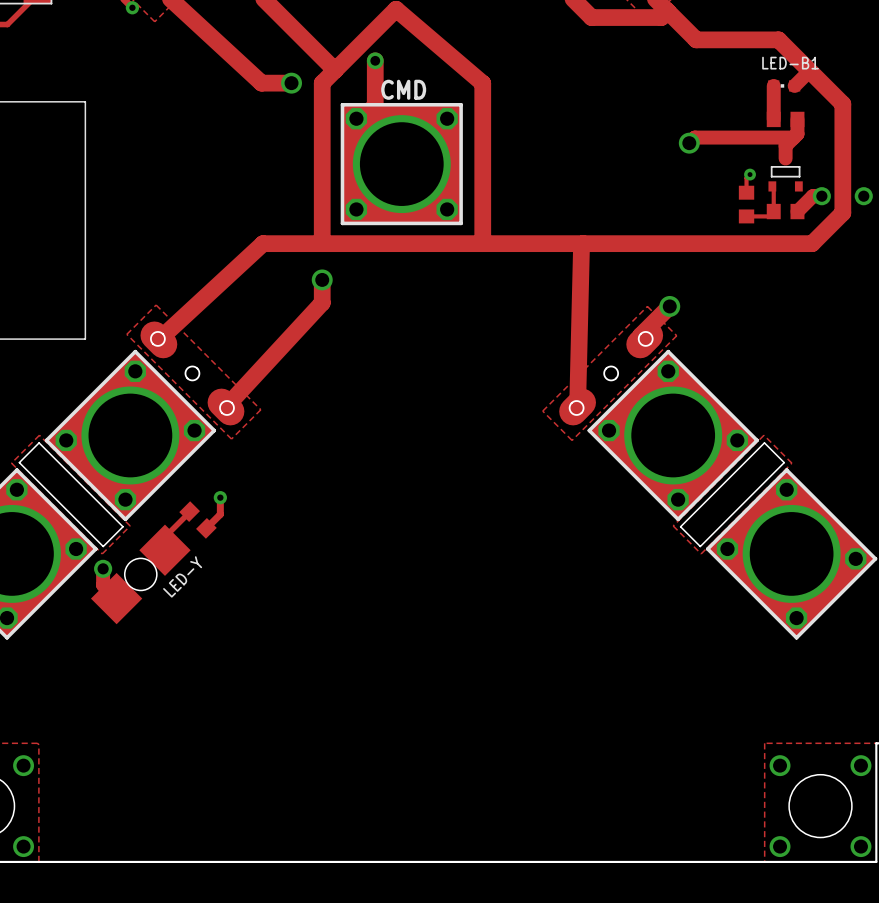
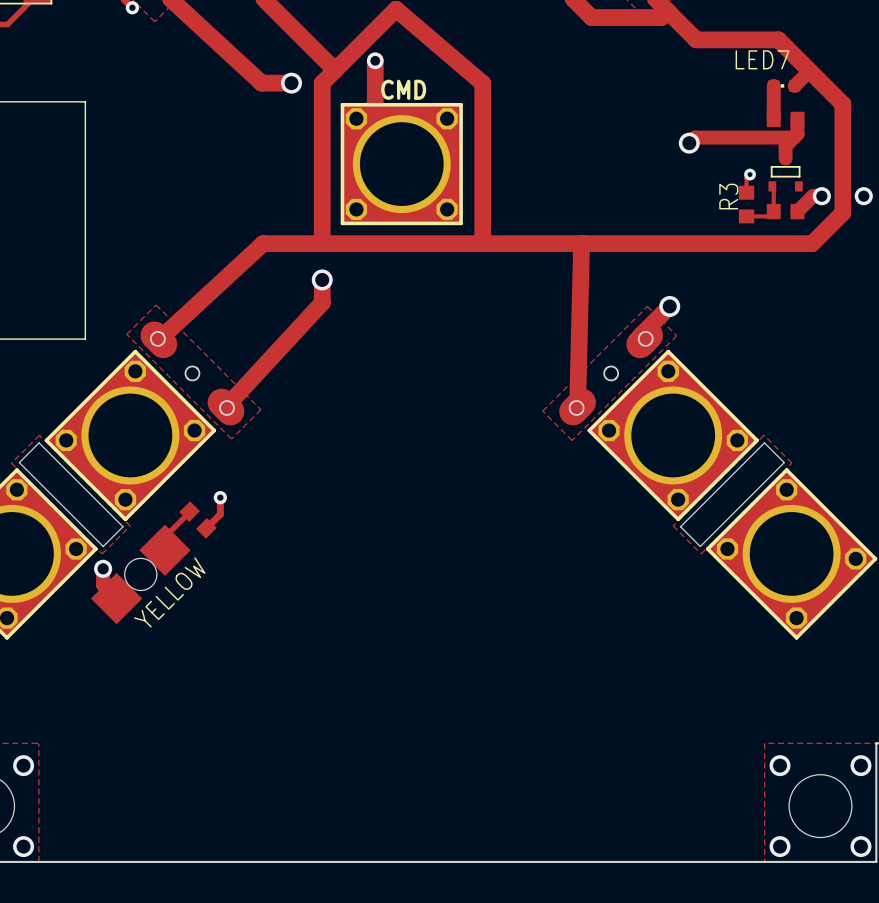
LED-B1 name: LED-B1 (790, 63) -> LED7 (762, 59)
R3 name: none -> R3 (728, 196)
LED-Y name: LED-Y (182, 576) -> YELLOW (169, 592)

